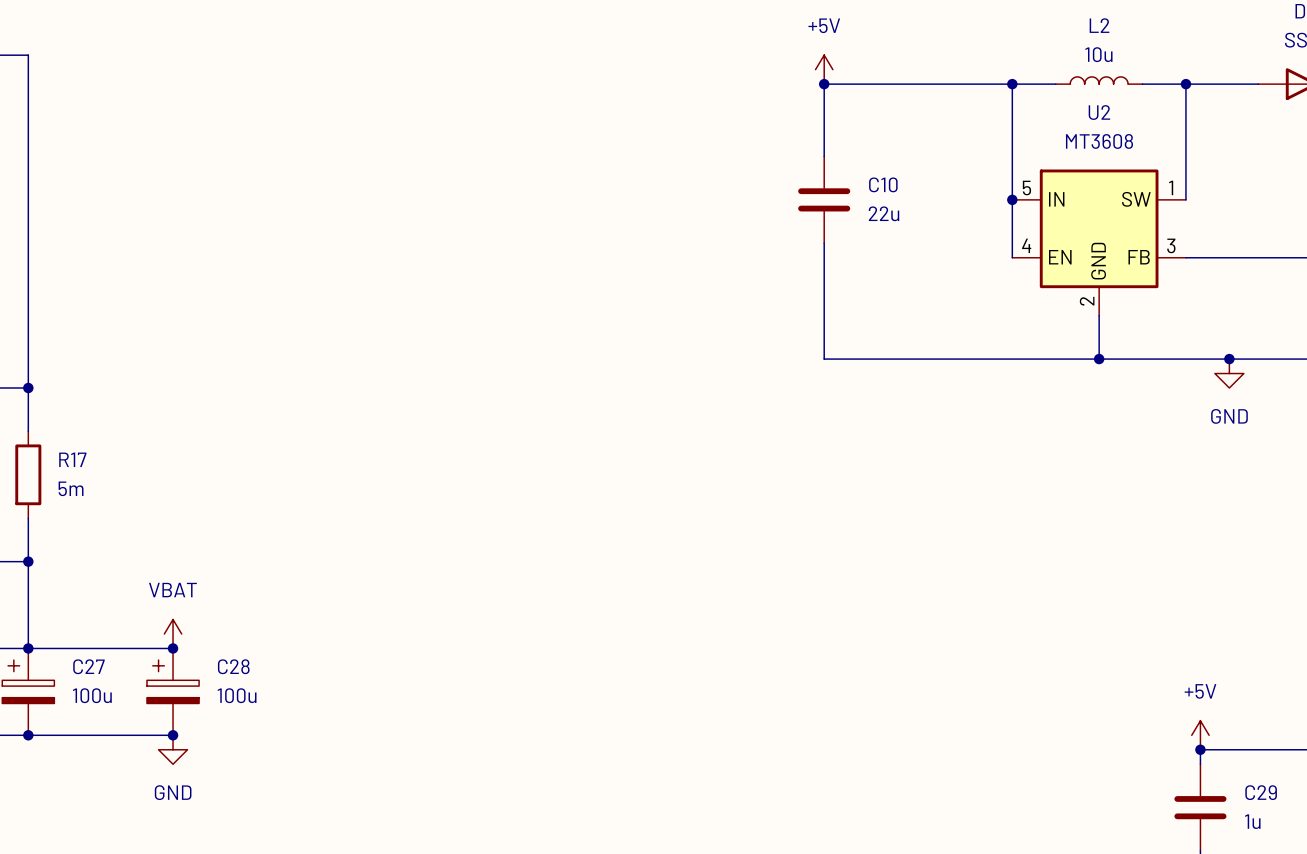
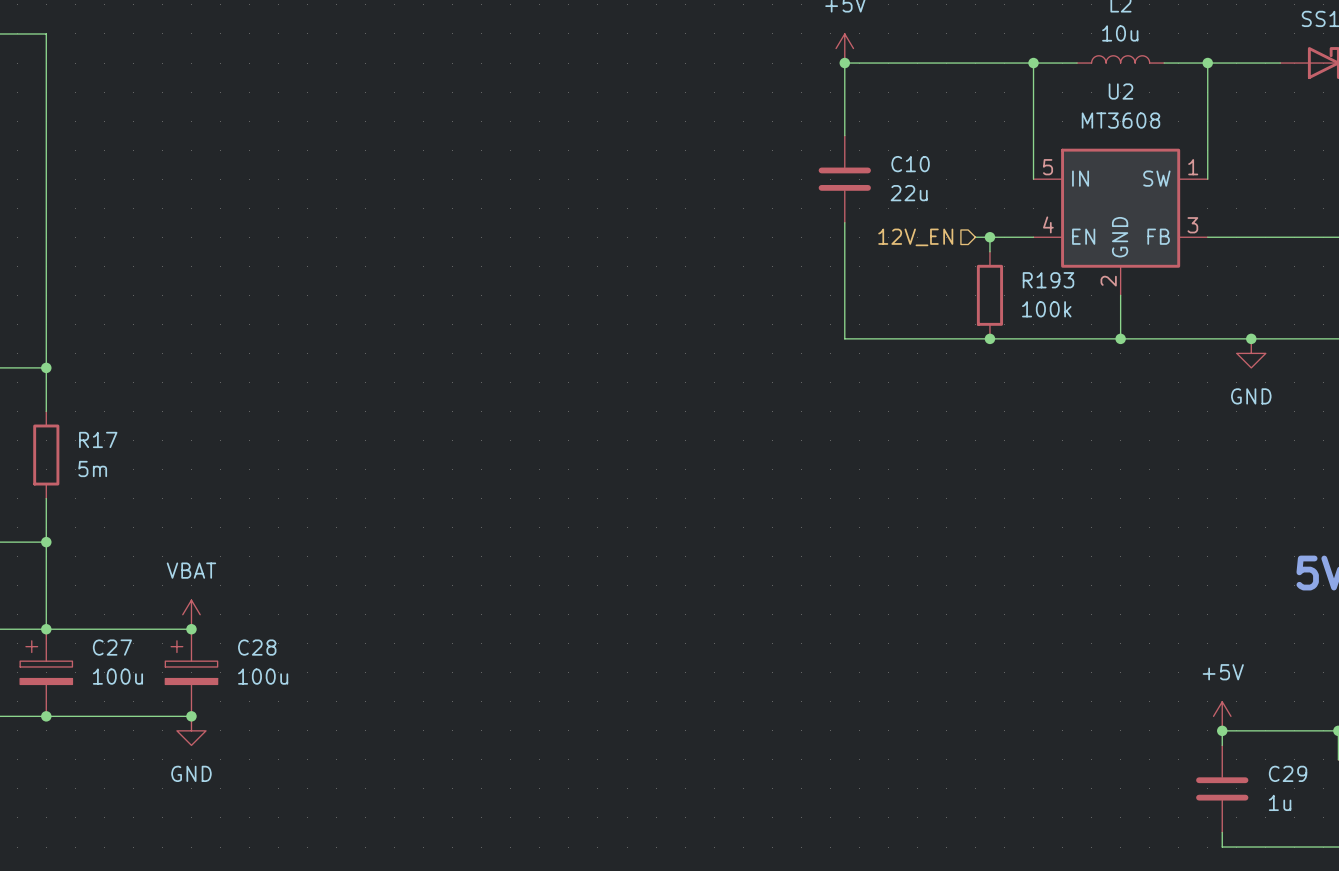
wire: (1012, 199) (1012, 257) -> (975, 237) (1033, 237)
junction: (1012, 199) -> none
hierarchical label: none -> 12V_EN (915, 237)
wire: none -> (989, 237) (989, 251)
junction: none -> (989, 237)
R193: none -> 100k (989, 295)
junction: none -> (989, 338)

